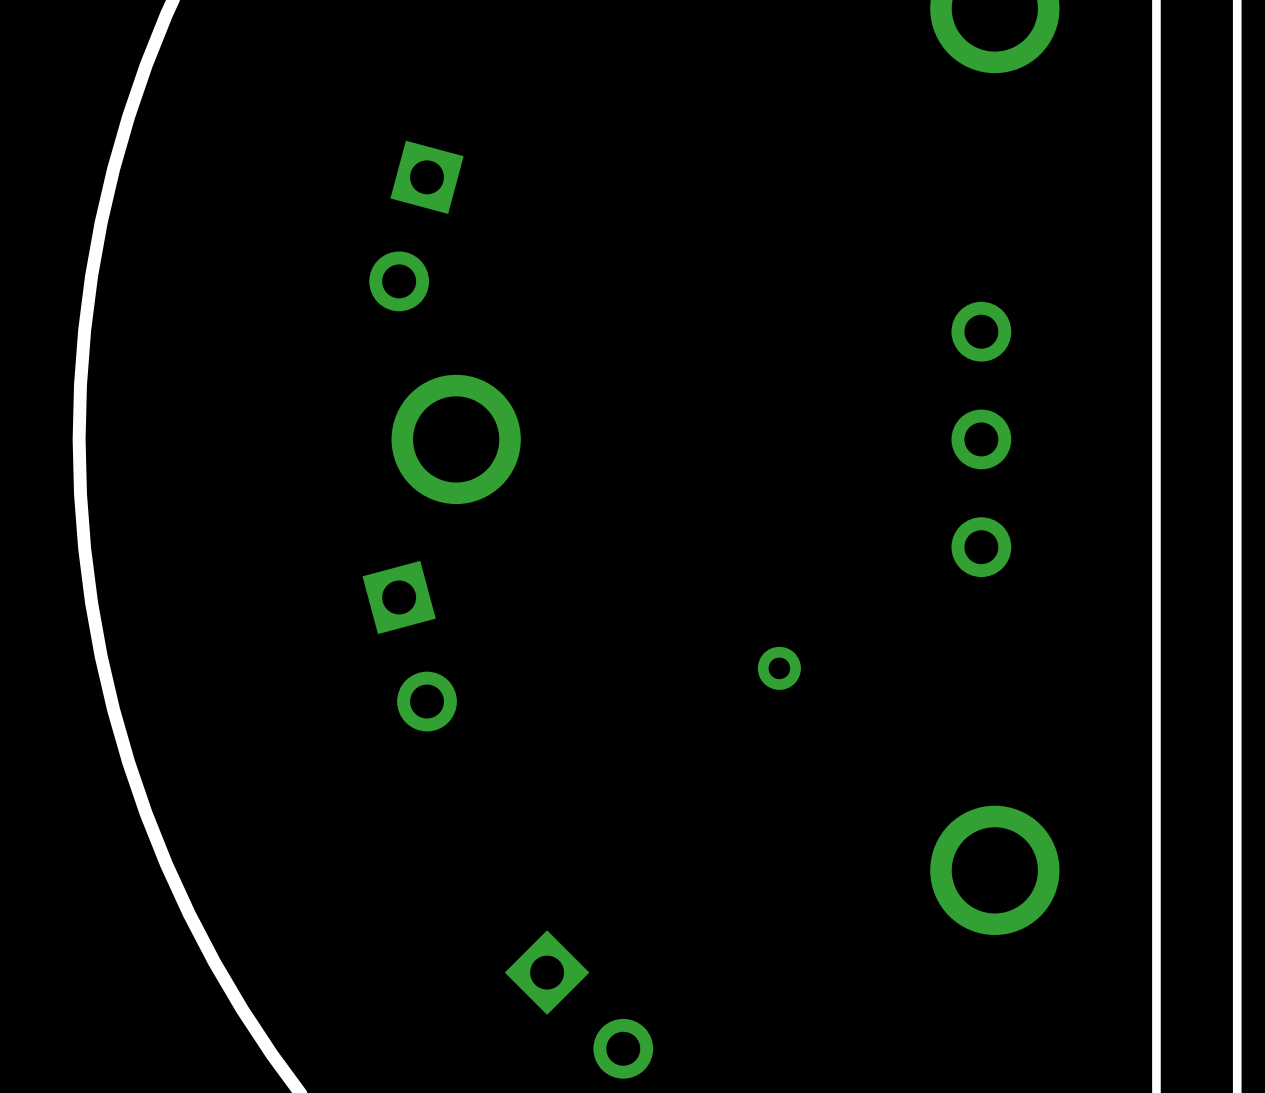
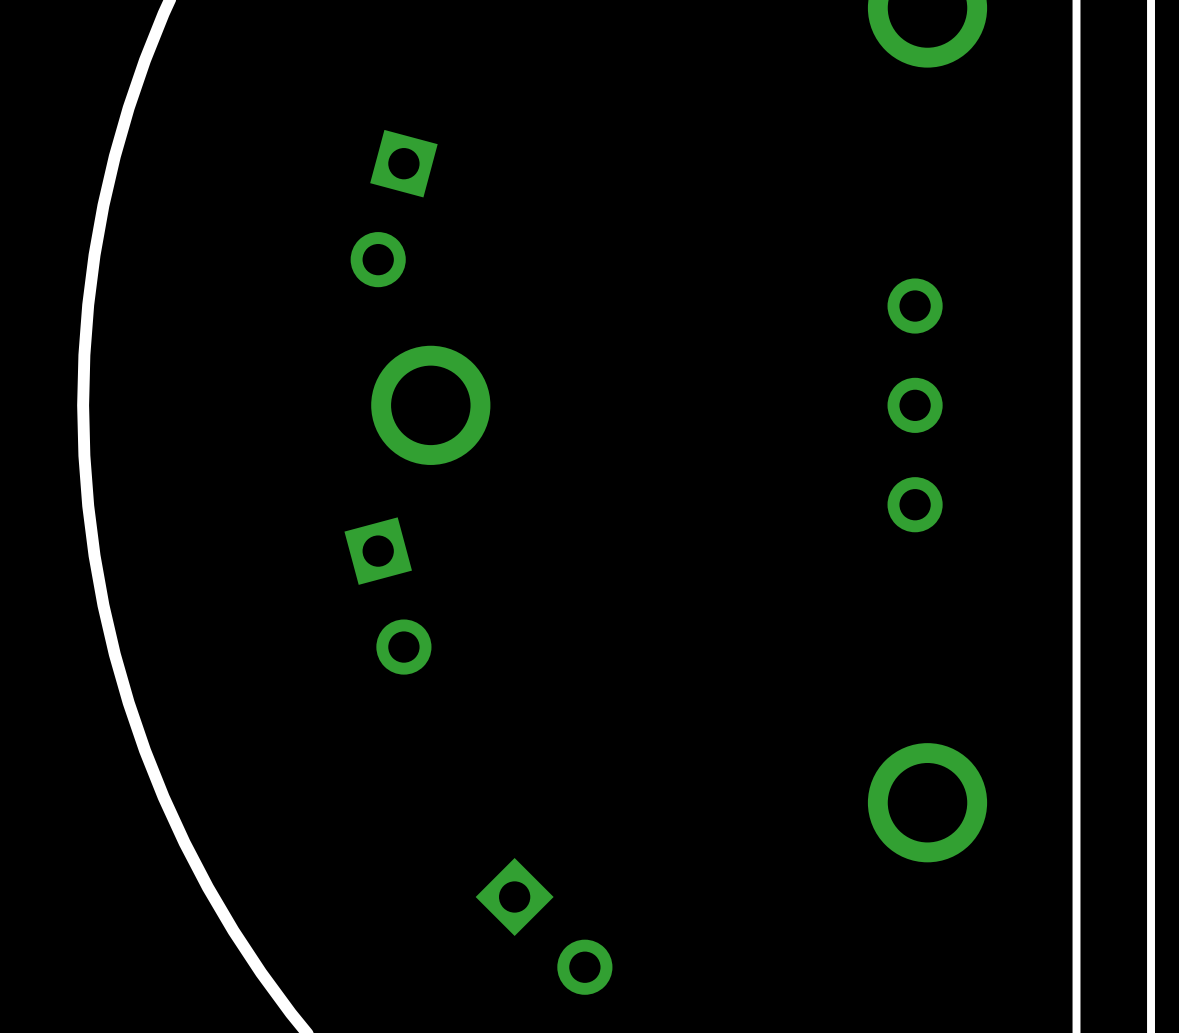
via: (779, 668) -> none

